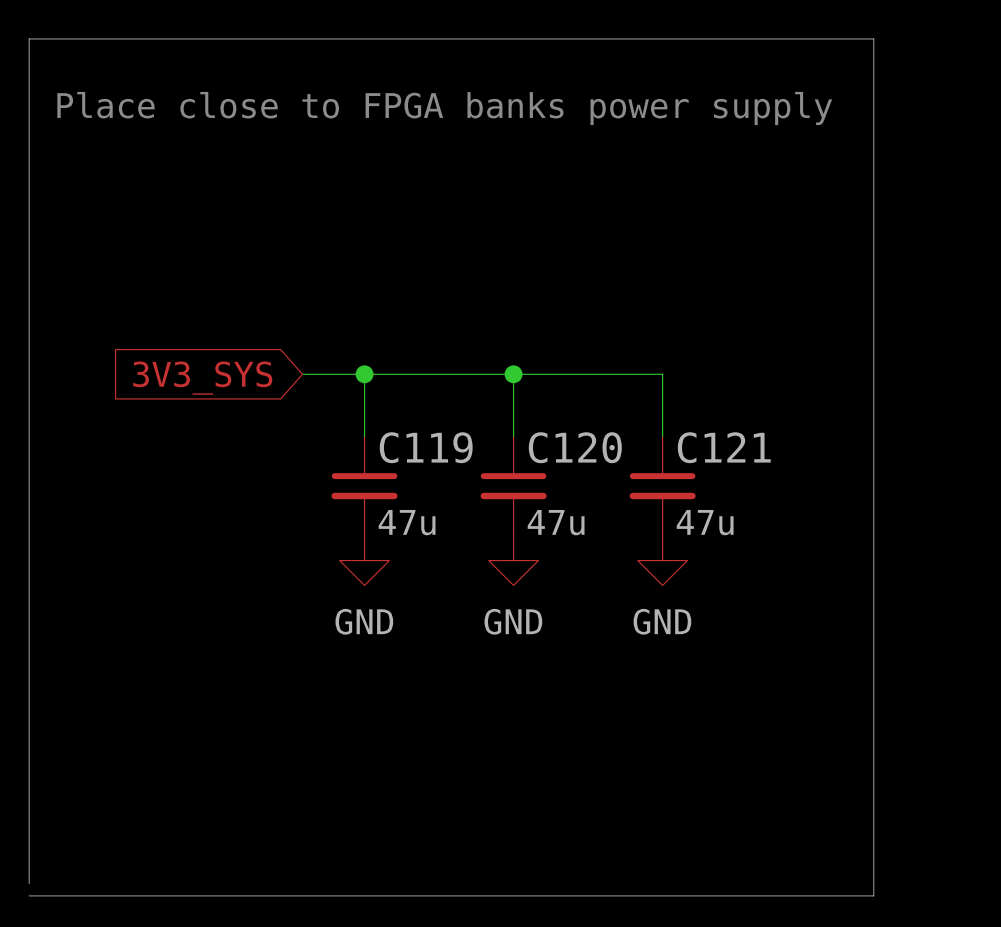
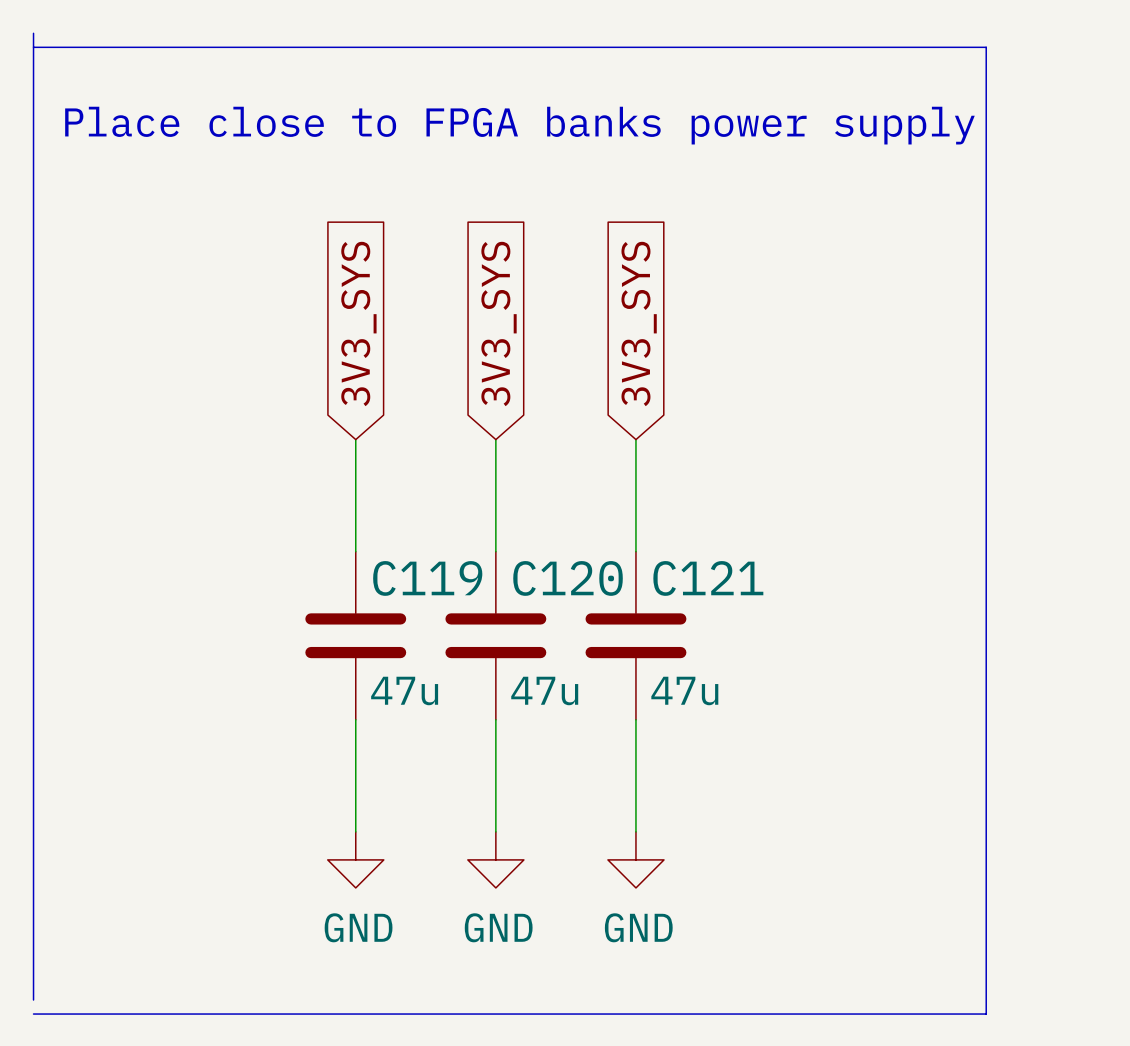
line: none -> (33, 33) (33, 47)
global label: none -> 3V3_SYS (499, 323)
global label: none -> 3V3_SYS (639, 323)
wire: (302, 374) (662, 374) (662, 436) -> none
wire: (364, 374) (364, 436) -> none
junction: (364, 374) -> none
wire: (513, 374) (513, 436) -> none
junction: (513, 374) -> none
global label rotation: 0° (202, 378) -> 90° clockwise (358, 323)
wire: none -> (355, 439) (355, 551)
wire: none -> (495, 439) (495, 551)
wire: none -> (635, 439) (635, 551)
C119 symbol: [331, 436, 398, 536] -> [305, 551, 407, 720]
C120 symbol: [480, 436, 547, 536] -> [445, 551, 547, 720]
C121 symbol: [629, 436, 696, 536] -> [585, 551, 687, 720]
power symbol: GND (364, 560) -> none
power symbol: GND (513, 560) -> none
power symbol: GND (662, 560) -> none
wire: none -> (355, 719) (355, 831)
wire: none -> (495, 719) (495, 831)
wire: none -> (635, 719) (635, 831)
power symbol: none -> GND (355, 859)
power symbol: none -> GND (495, 859)
power symbol: none -> GND (635, 859)

